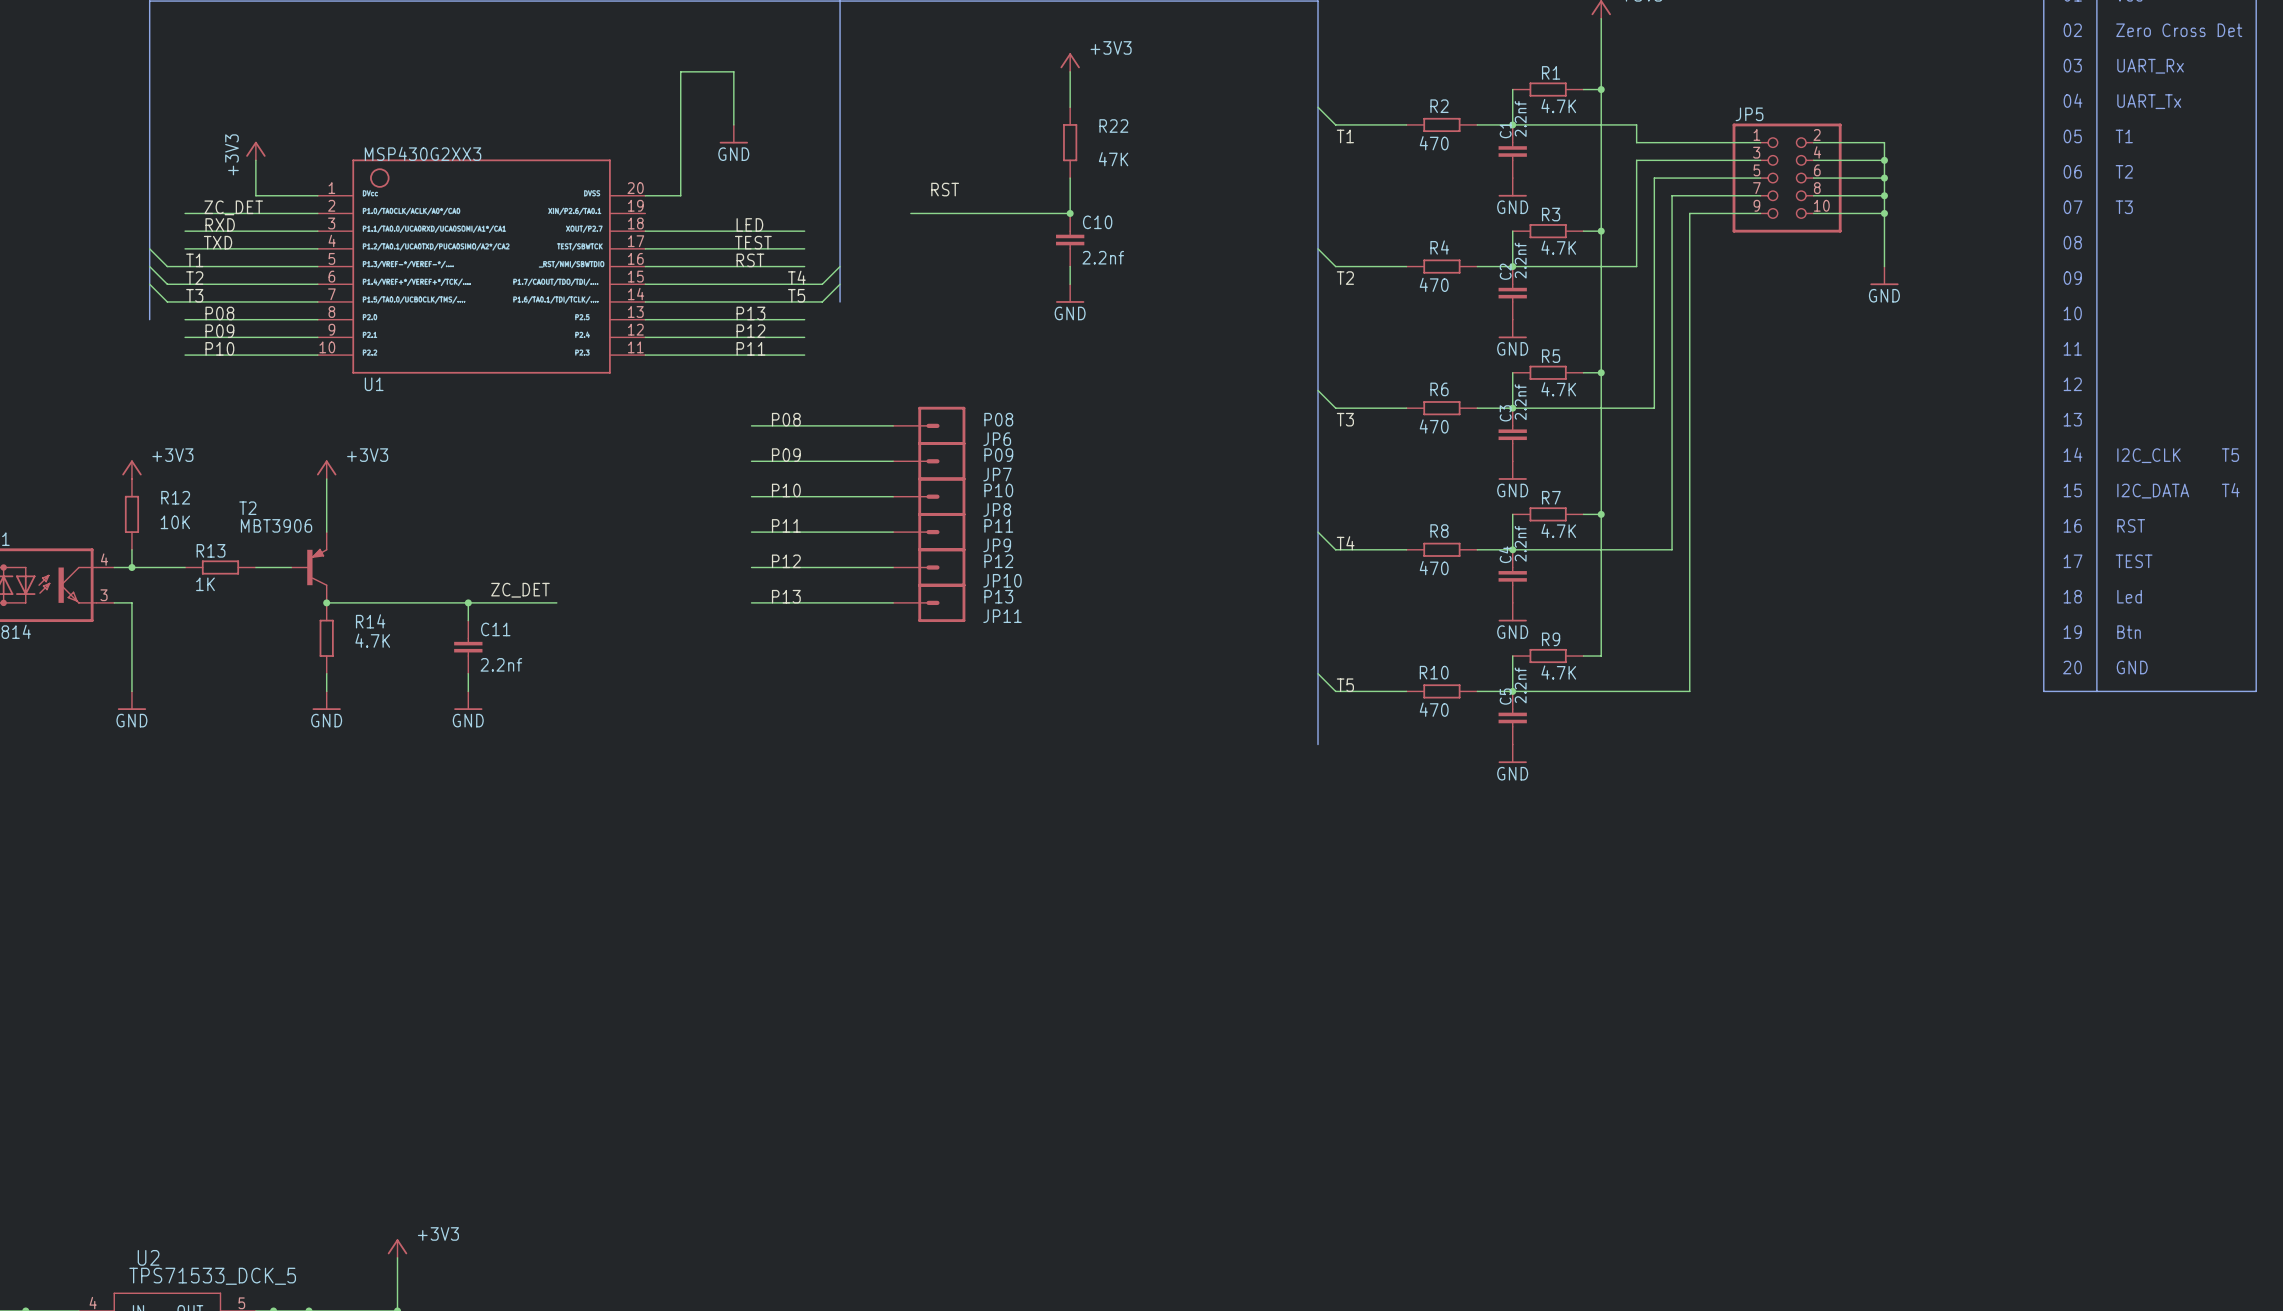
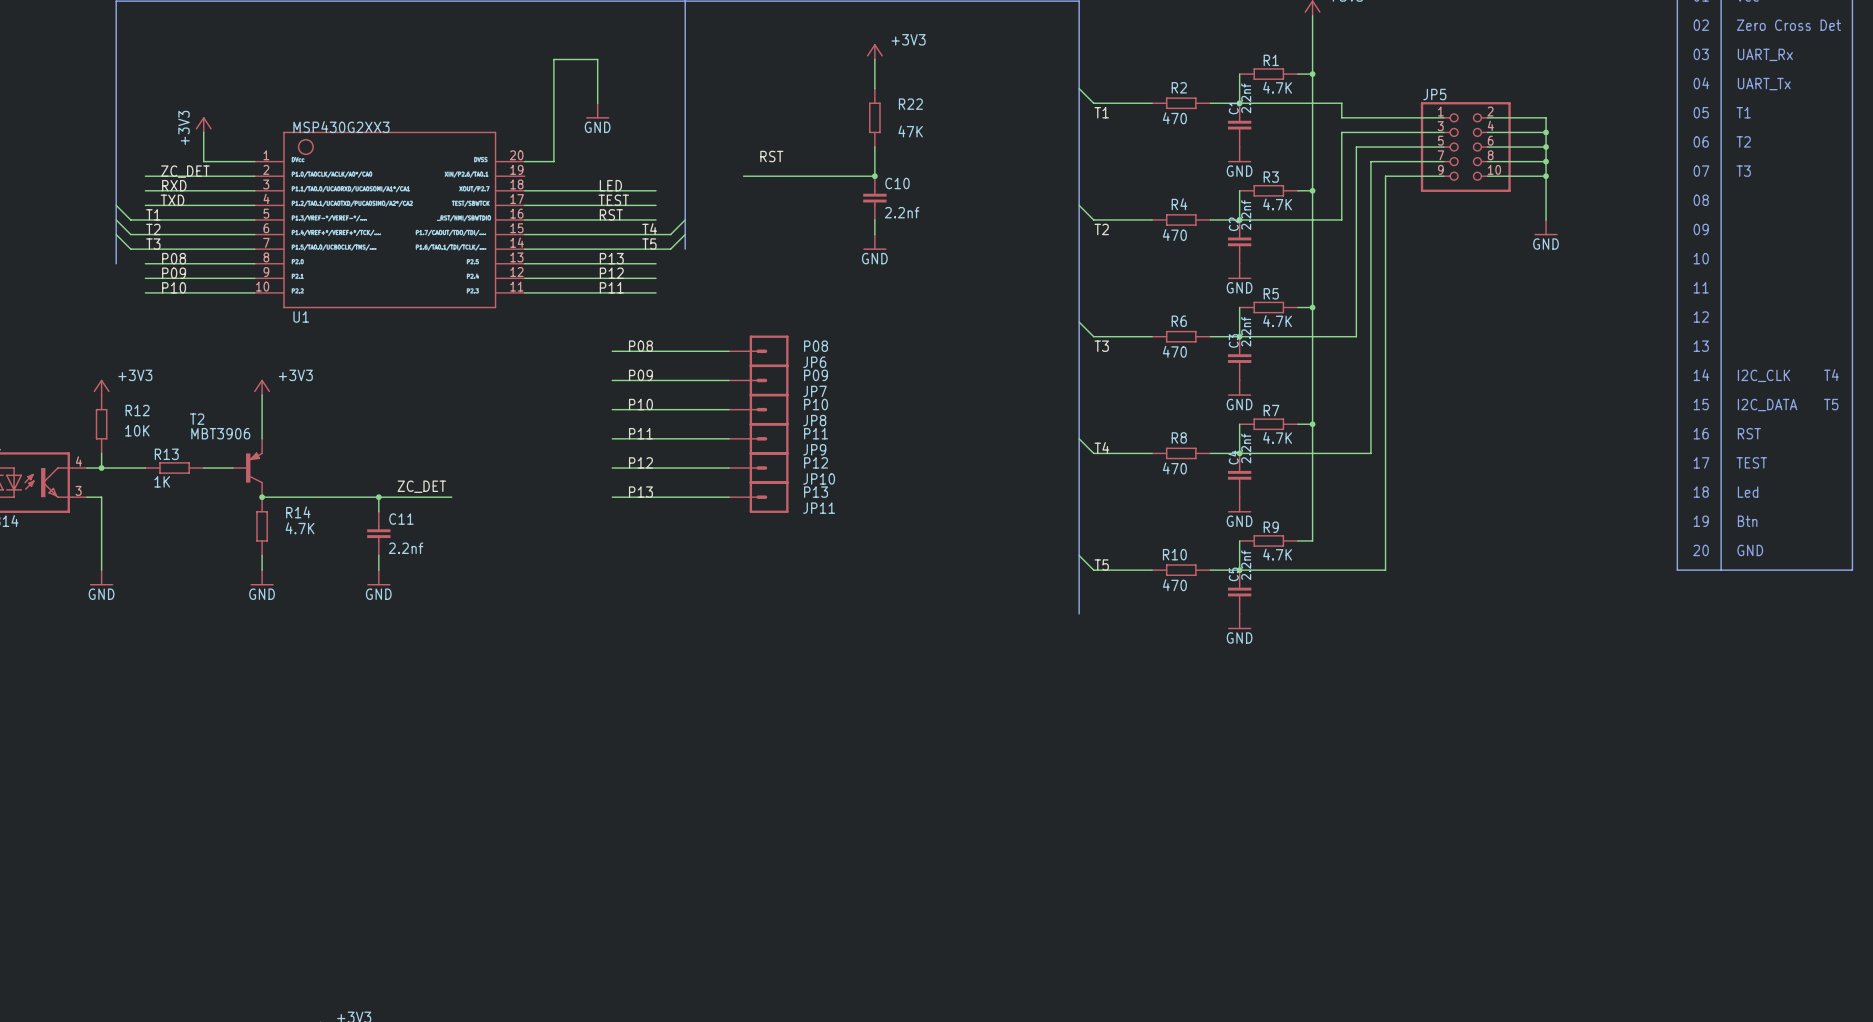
text: T5 (2230, 455) -> T4 (1831, 375)
text: T4 (2230, 490) -> T5 (1831, 404)

